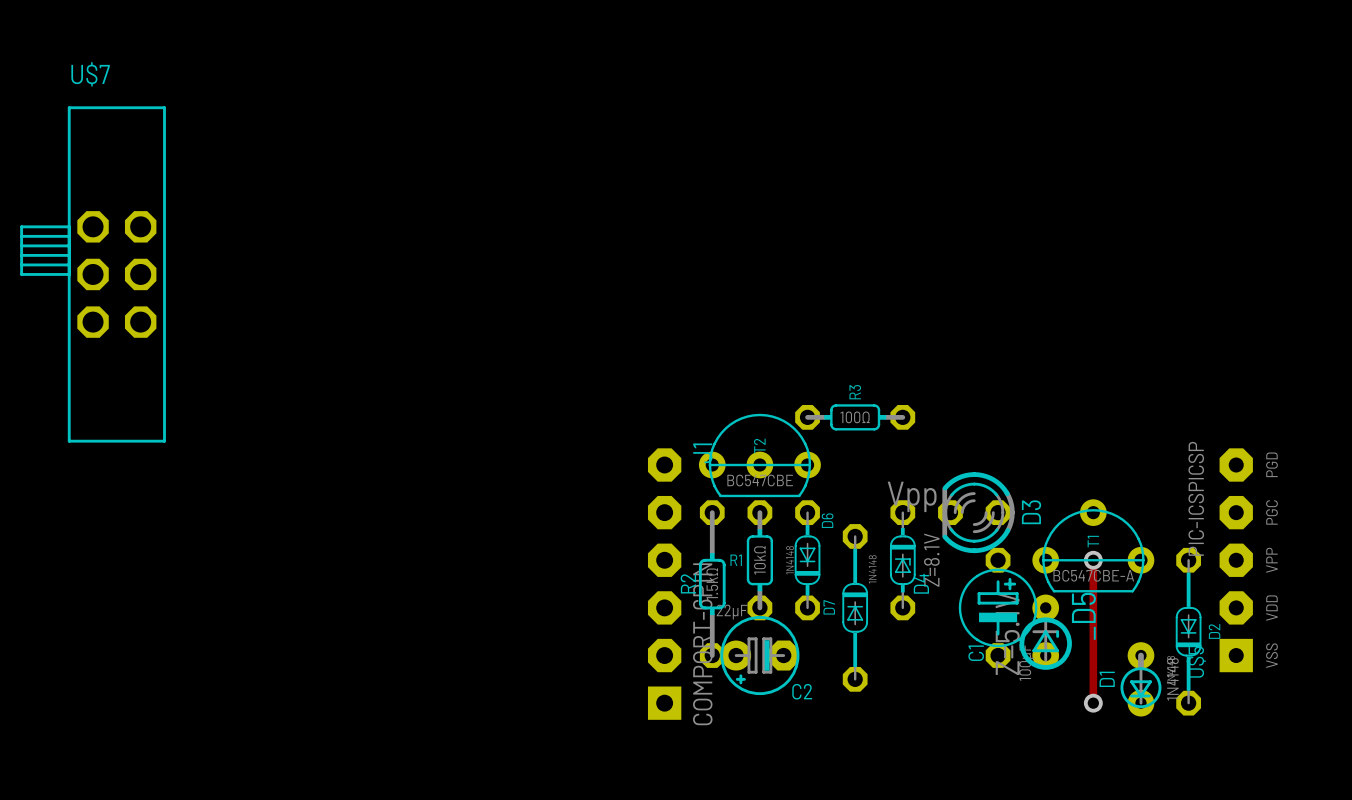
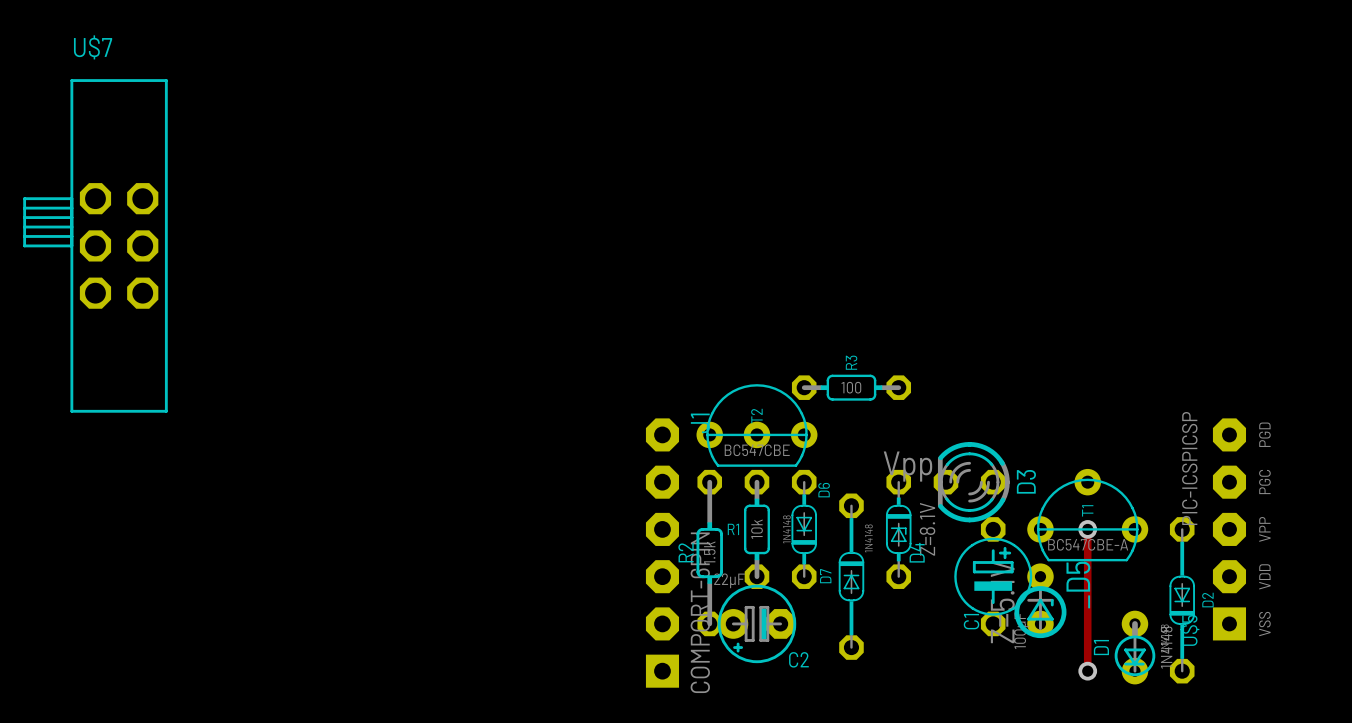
R3 value: 100Ω (855, 417) -> 100 (851, 387)
R1 value: 10kΩ (759, 560) -> 10k (756, 529)
R2 value: 1.5kΩ (712, 584) -> 1.5k (709, 552)

